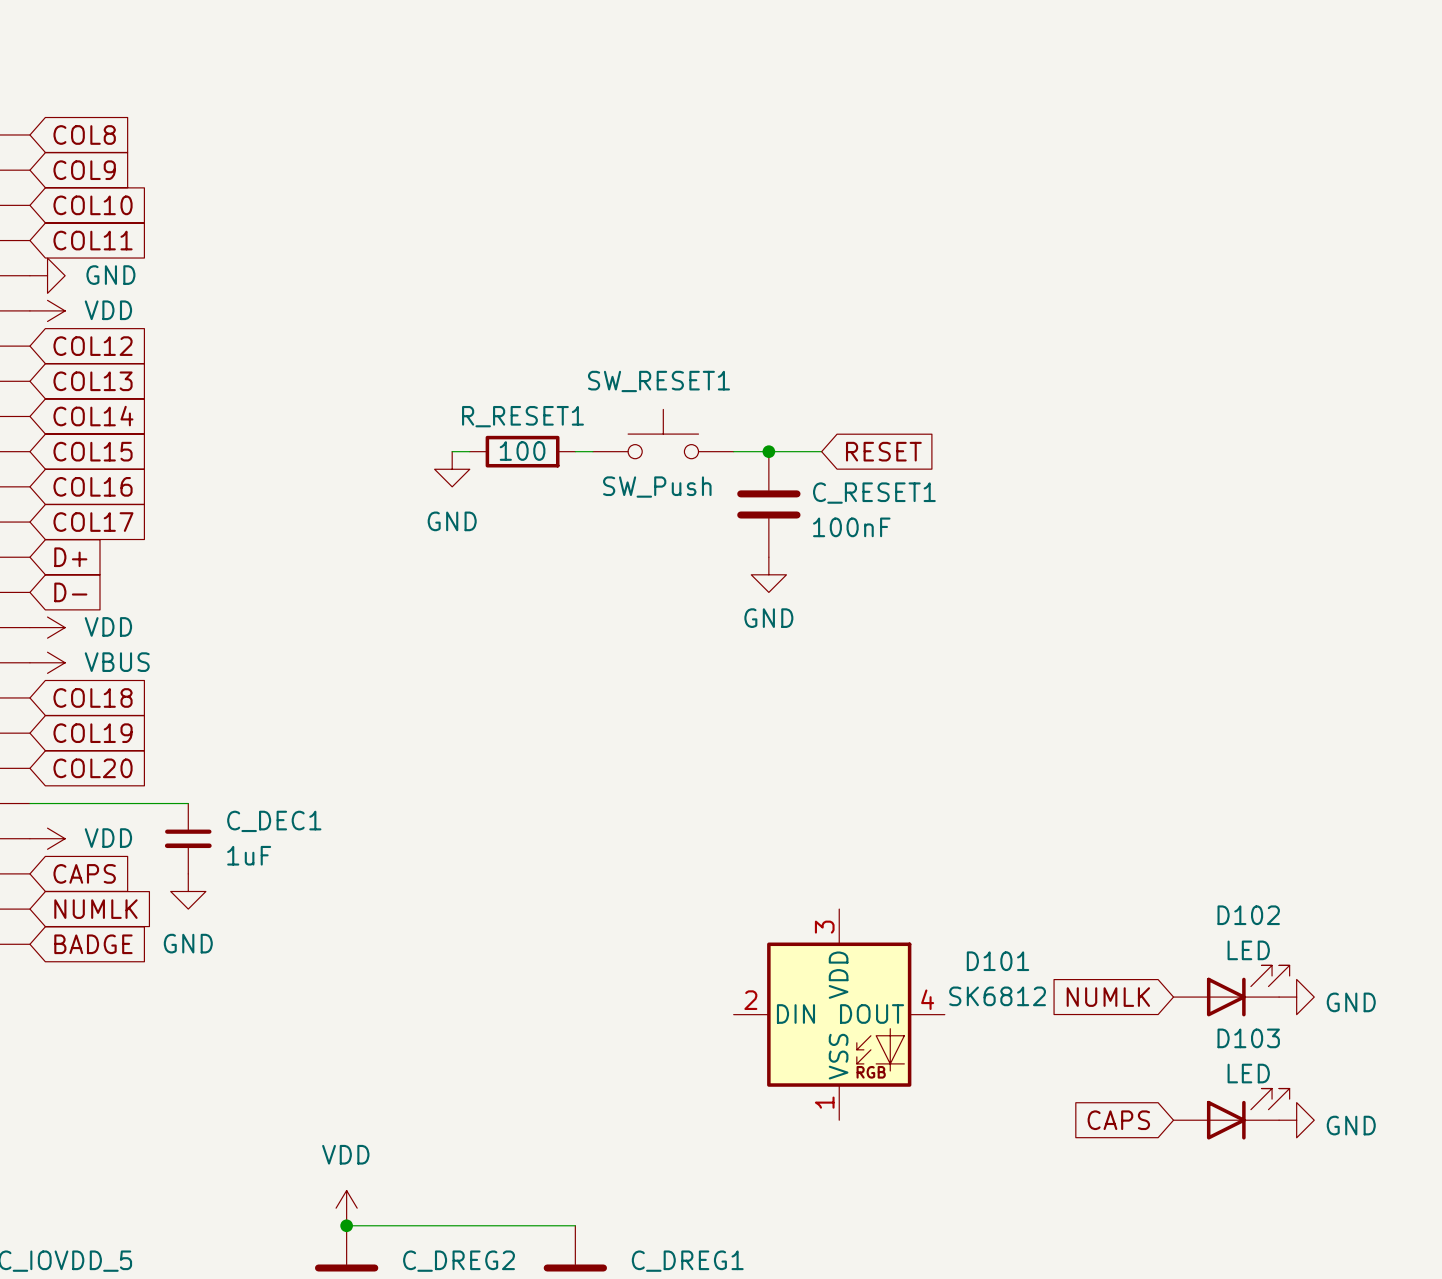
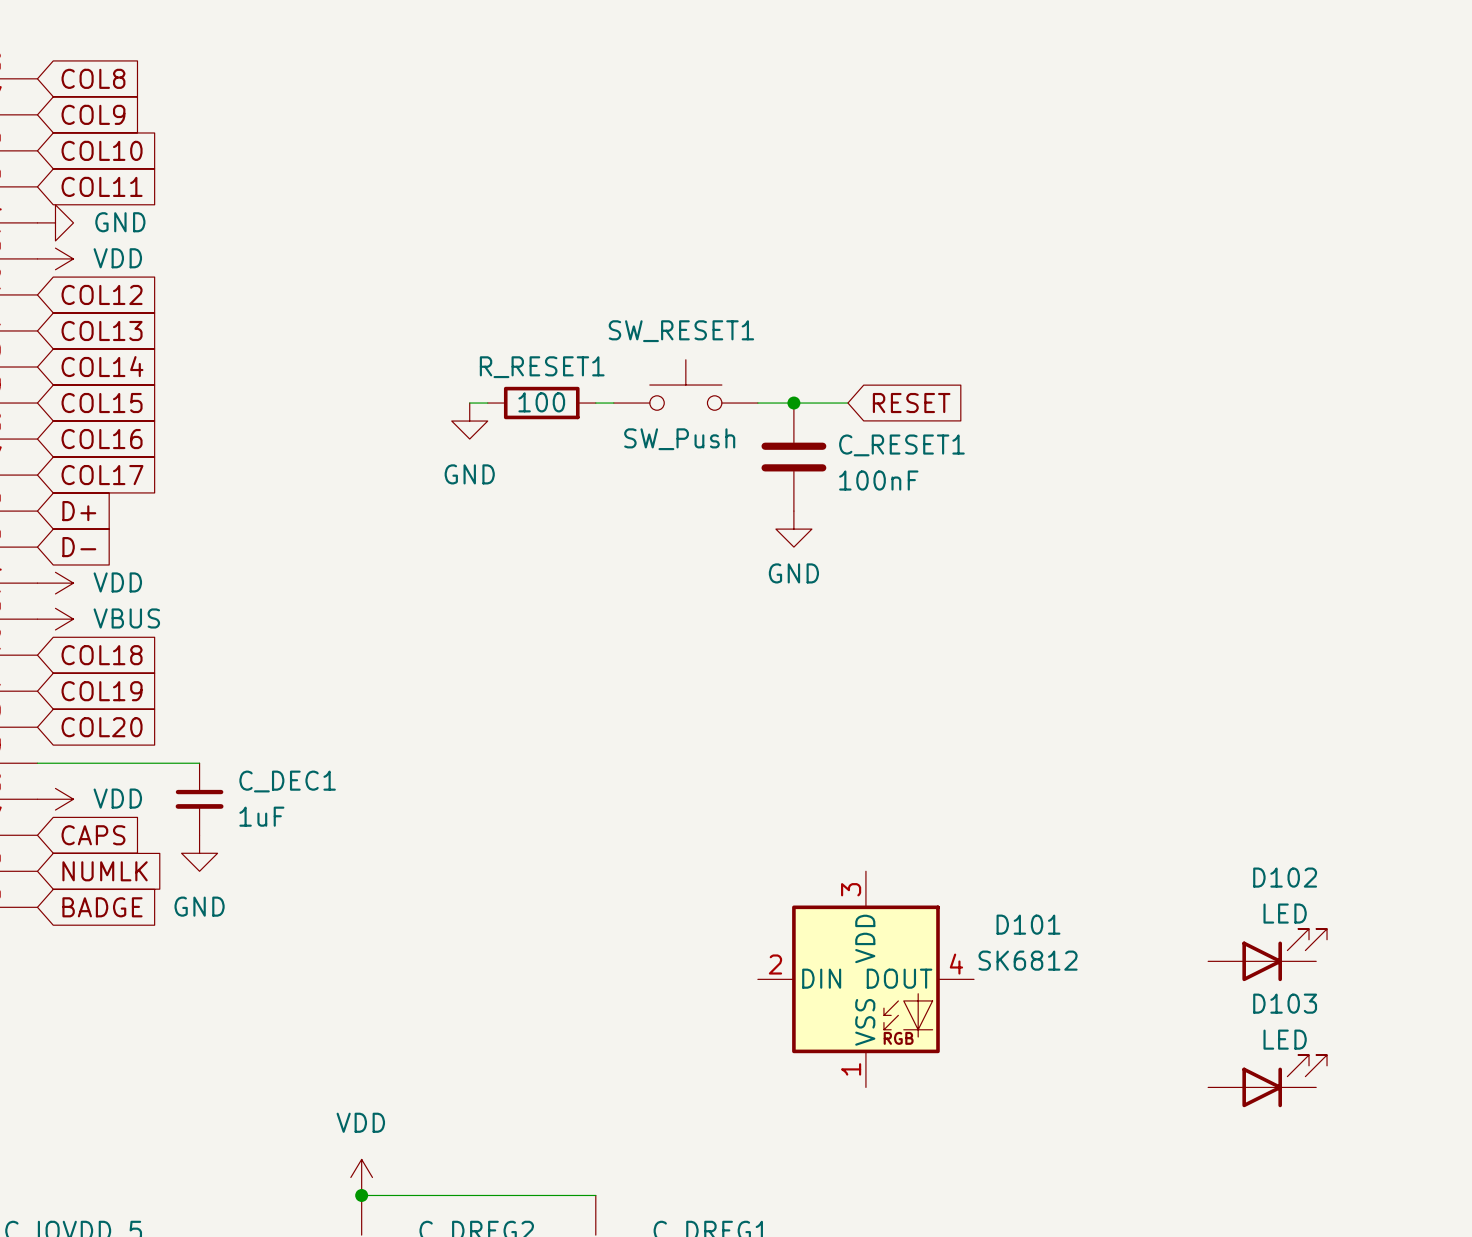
global label: NUMLK (1108, 997) -> none
power symbol: GND (1296, 997) -> none
global label: CAPS (1118, 1120) -> none
power symbol: GND (1296, 1120) -> none

